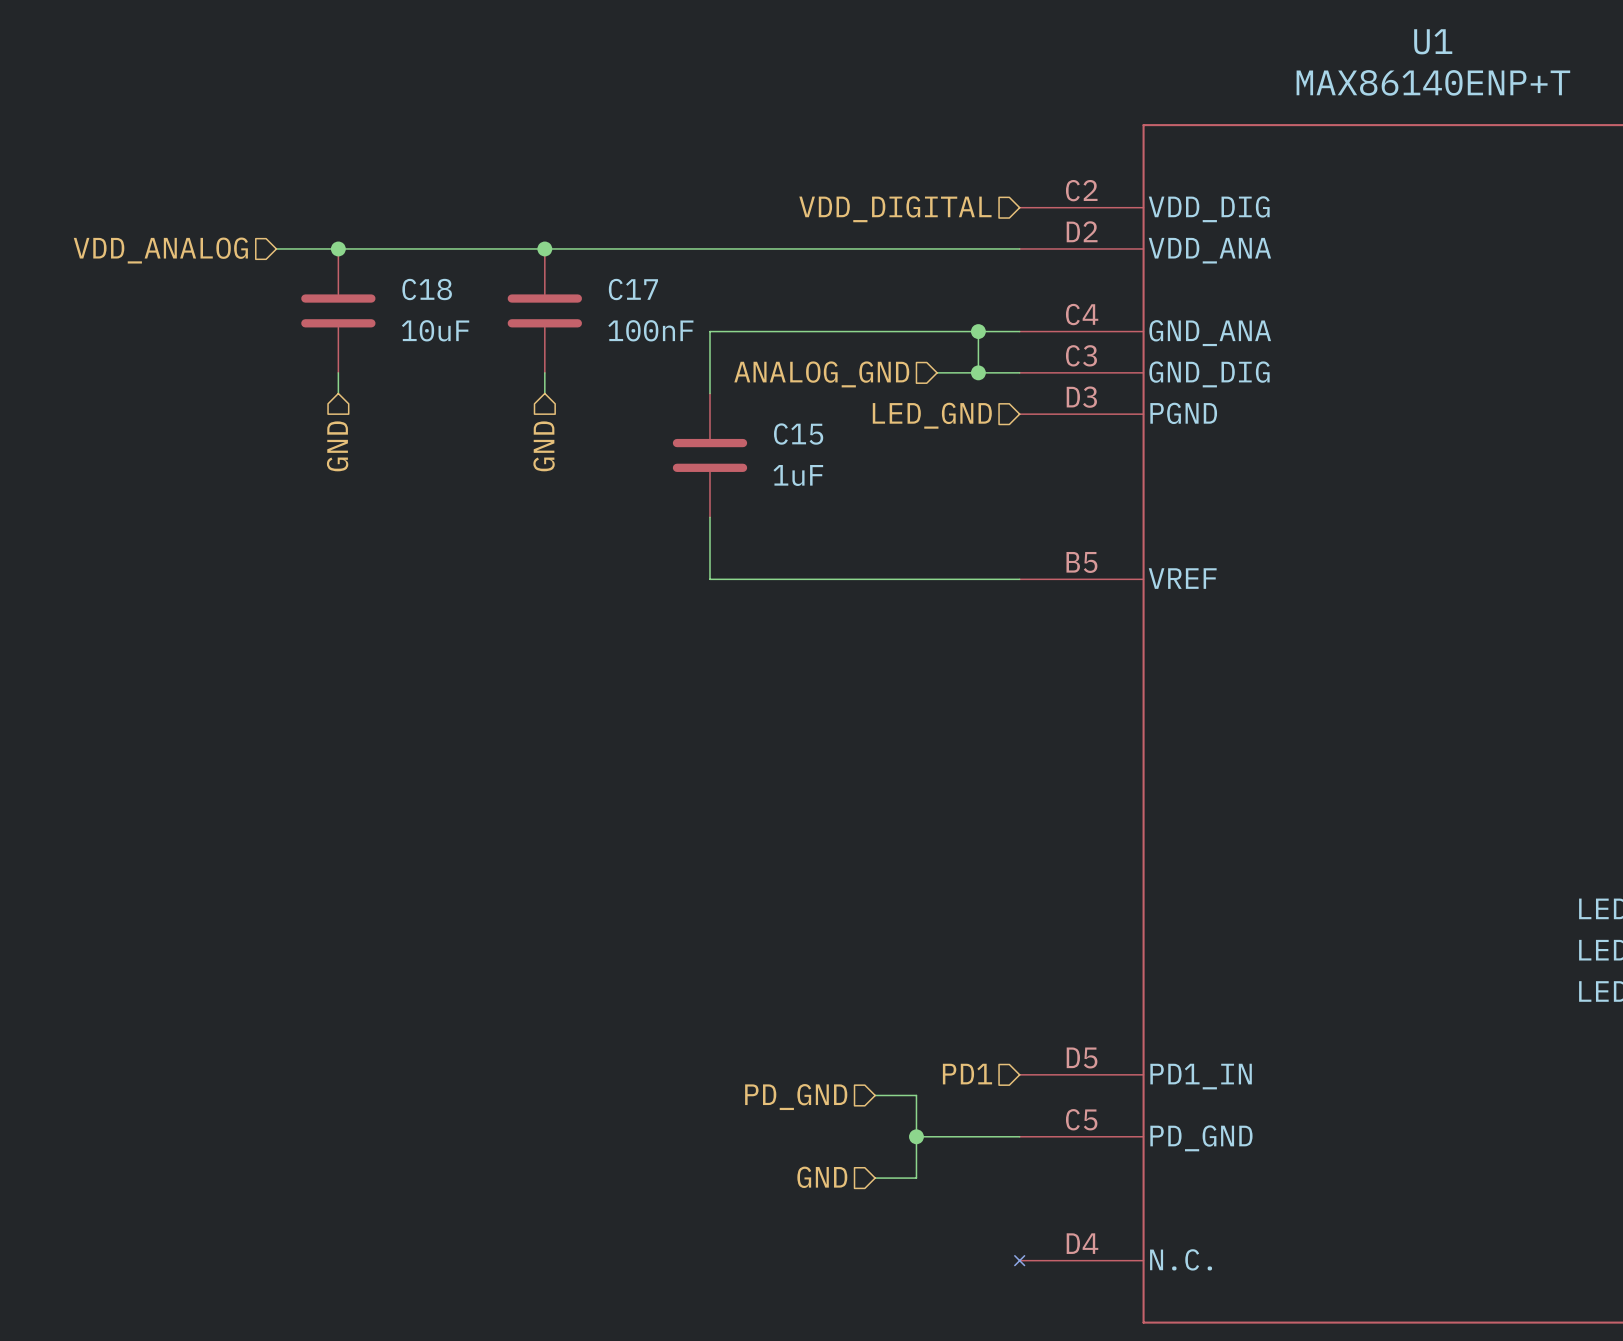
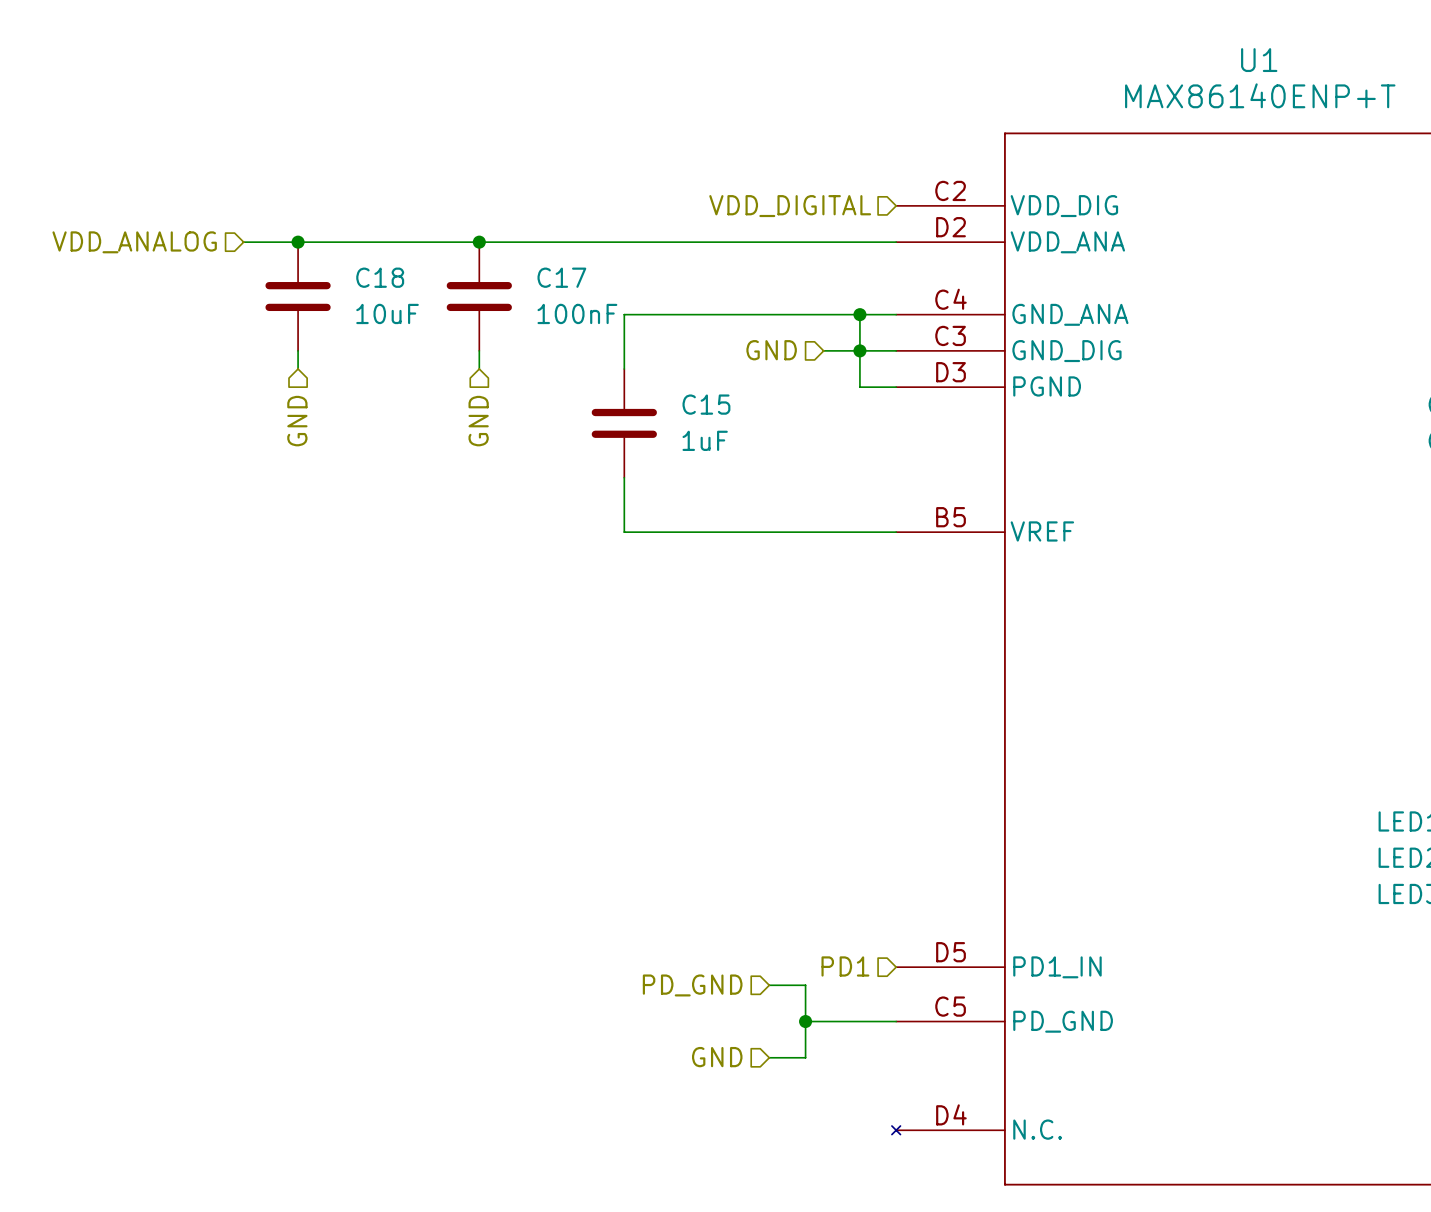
wire: none -> (859, 350) (859, 387) (896, 387)
hierarchical label: ANALOG_GND (821, 374) -> GND (771, 350)
hierarchical label: LED_GND (932, 415) -> none

